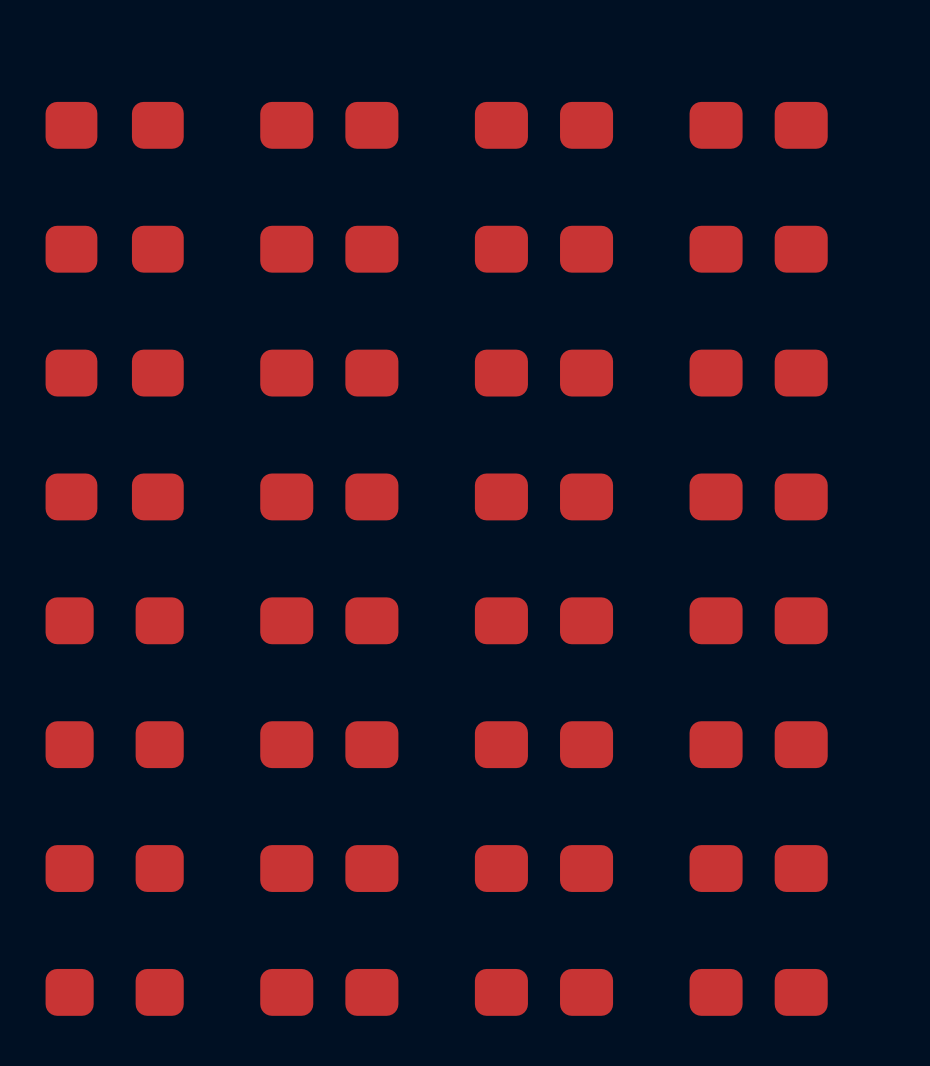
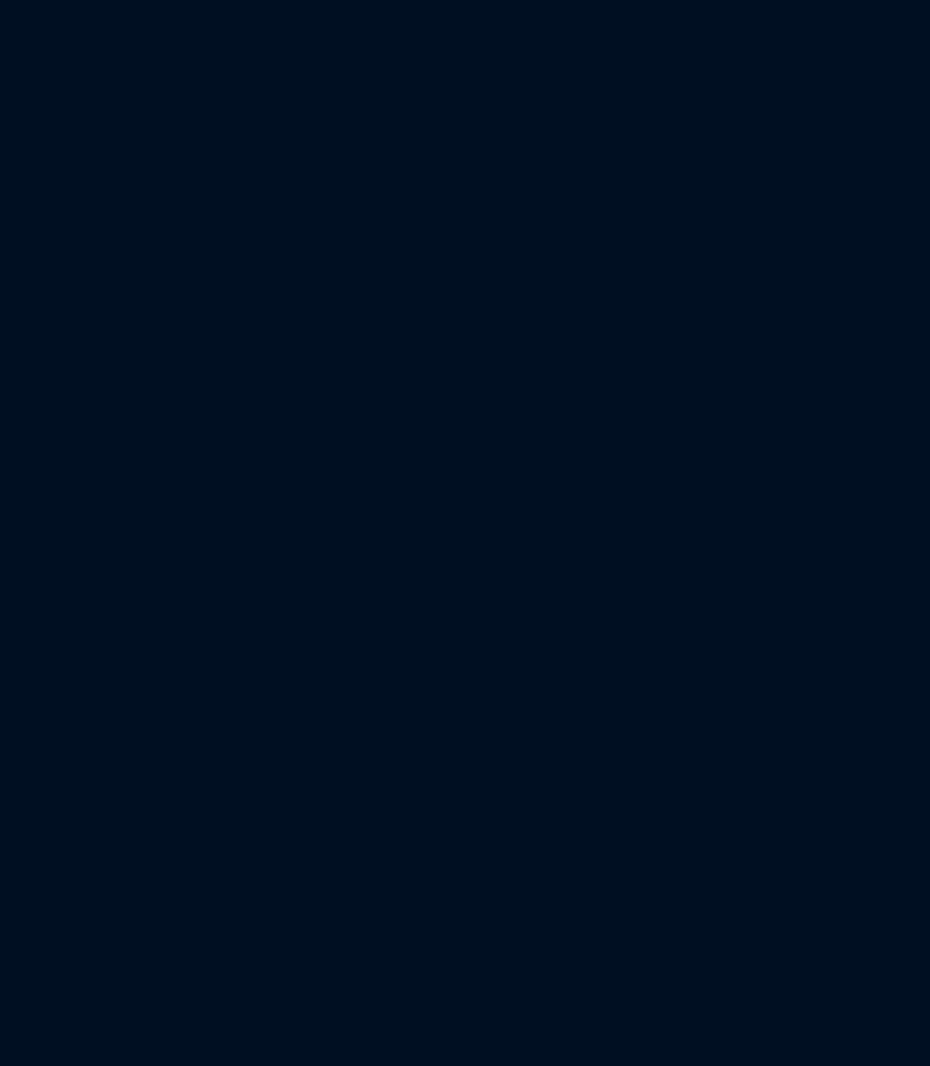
part: (114, 125) -> none
part: (329, 125) -> none
part: (543, 125) -> none
part: (758, 125) -> none
part: (114, 249) -> none
part: (329, 249) -> none
part: (543, 249) -> none
part: (758, 249) -> none
part: (114, 373) -> none
part: (329, 373) -> none
part: (543, 373) -> none
part: (758, 373) -> none
part: (114, 496) -> none
part: (329, 496) -> none
part: (543, 496) -> none
part: (758, 496) -> none
part: (114, 620) -> none
part: (329, 620) -> none
part: (543, 620) -> none
part: (758, 620) -> none
part: (114, 744) -> none
part: (329, 744) -> none
part: (543, 744) -> none
part: (758, 744) -> none
part: (114, 868) -> none
part: (329, 868) -> none
part: (543, 868) -> none
part: (758, 868) -> none
part: (114, 992) -> none
part: (329, 992) -> none
part: (543, 992) -> none
part: (758, 992) -> none

